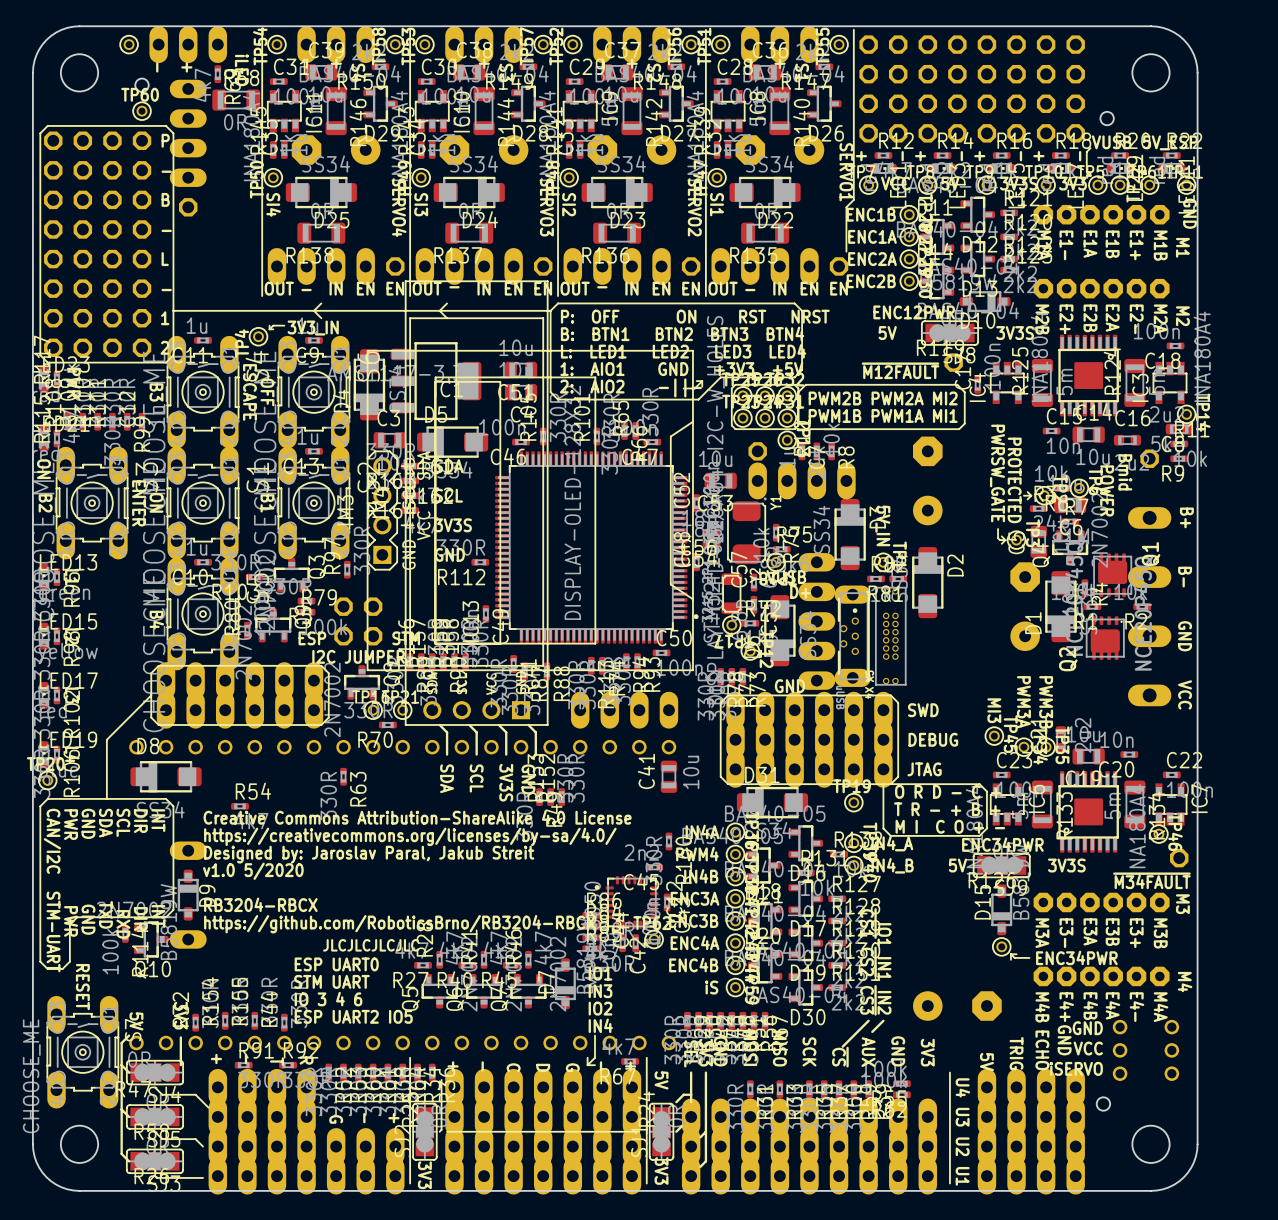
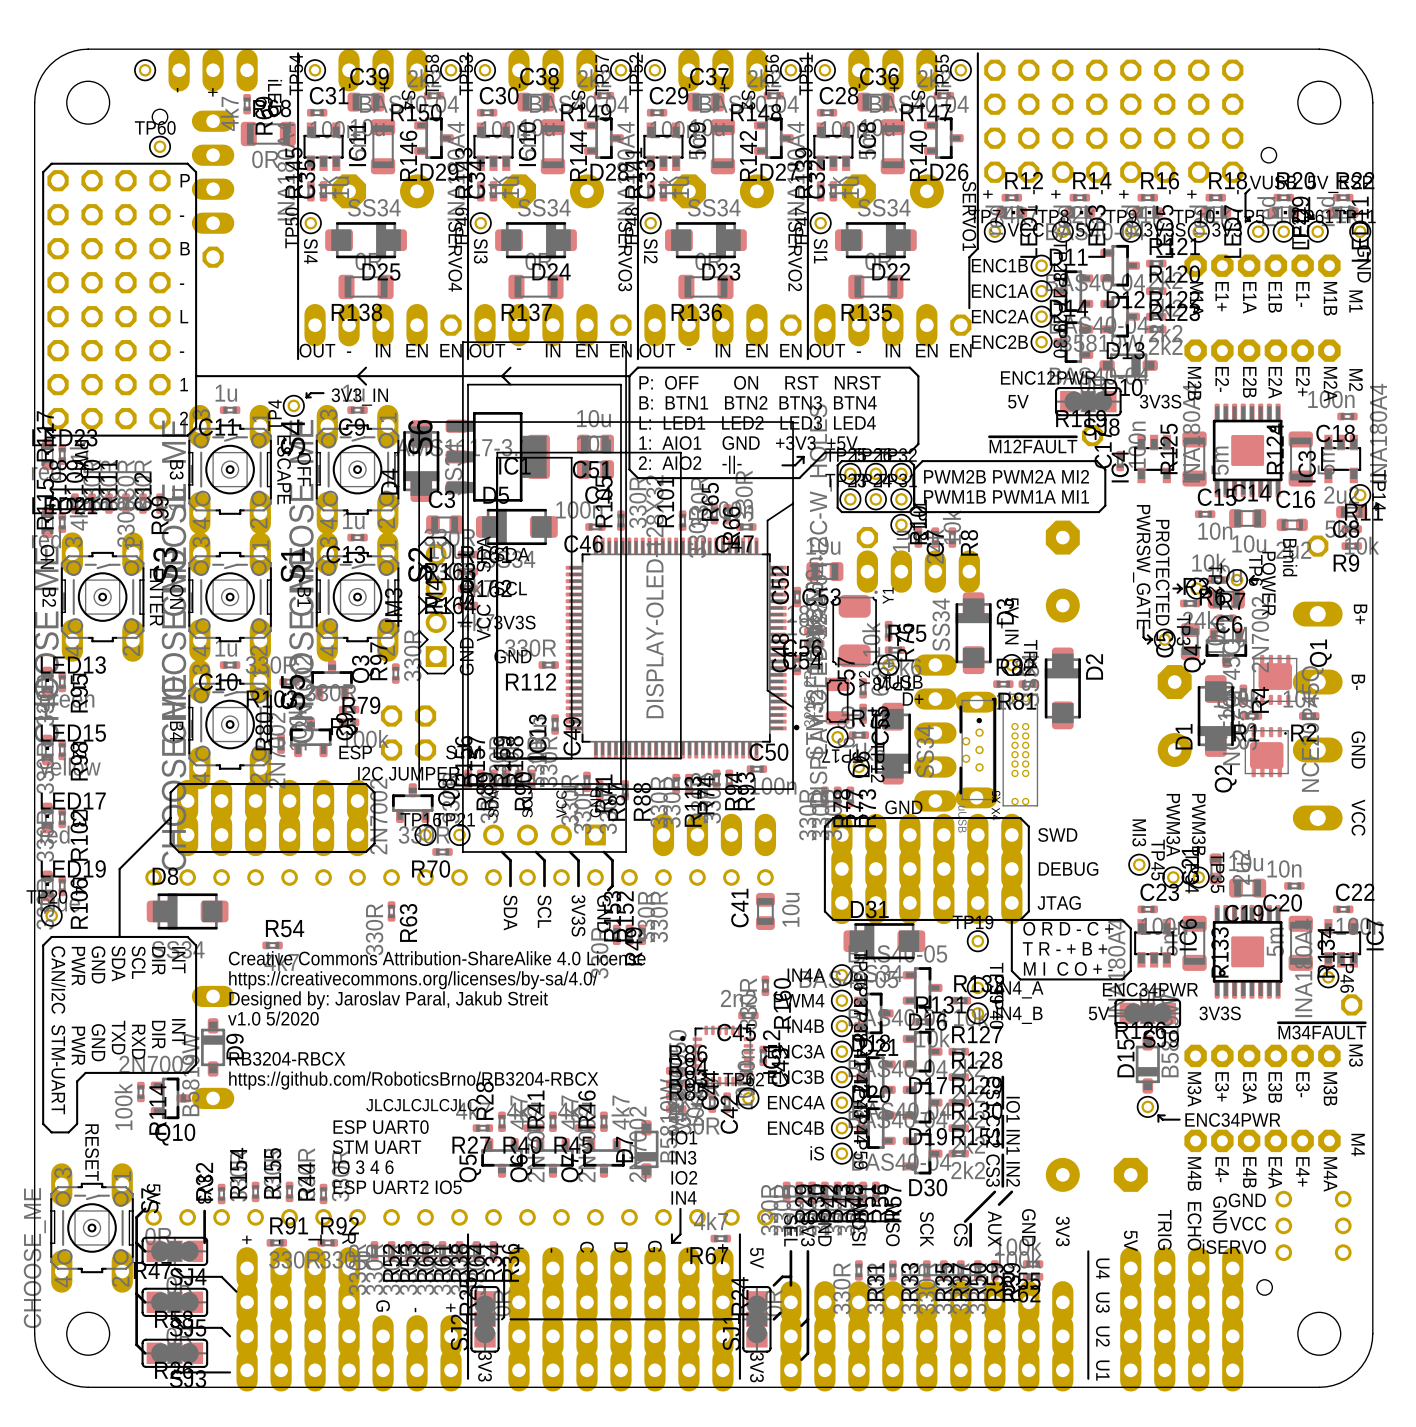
text: E1- (1066, 245) -> E1+ (1222, 296)
text: E1+ (1136, 245) -> E1- (1302, 294)
text: E2+ (1066, 319) -> E2- (1222, 379)
text: E2- (1136, 319) -> E2+ (1302, 381)
text: E3- (1066, 933) -> E3+ (1222, 1086)
text: E3+ (1136, 933) -> E3- (1302, 1084)
text: E4+ (1066, 1007) -> E4- (1222, 1169)
text: E4- (1136, 1007) -> E4+ (1302, 1171)

